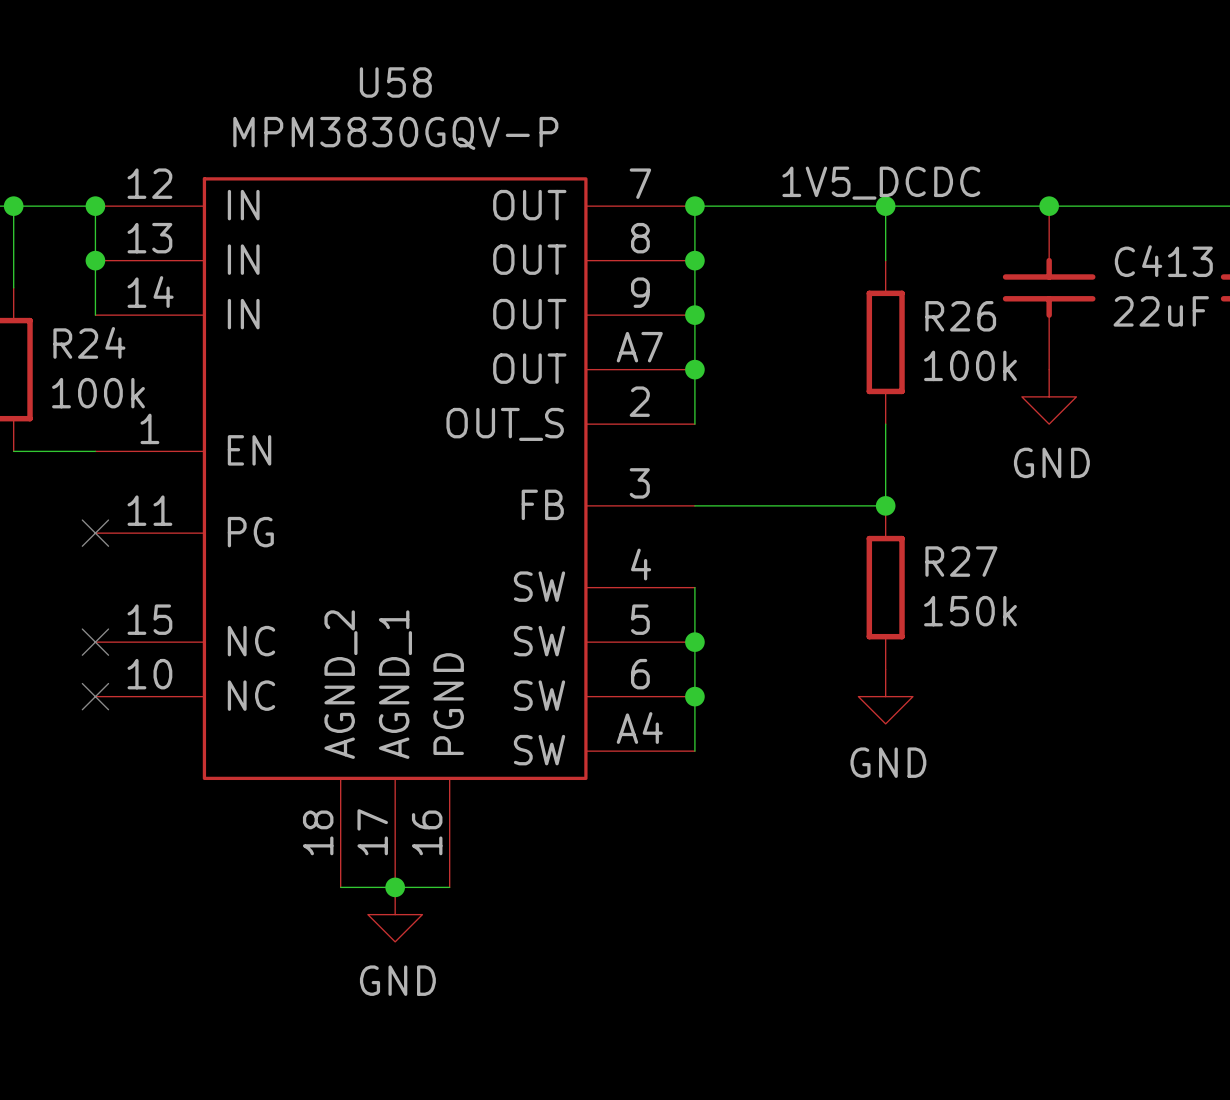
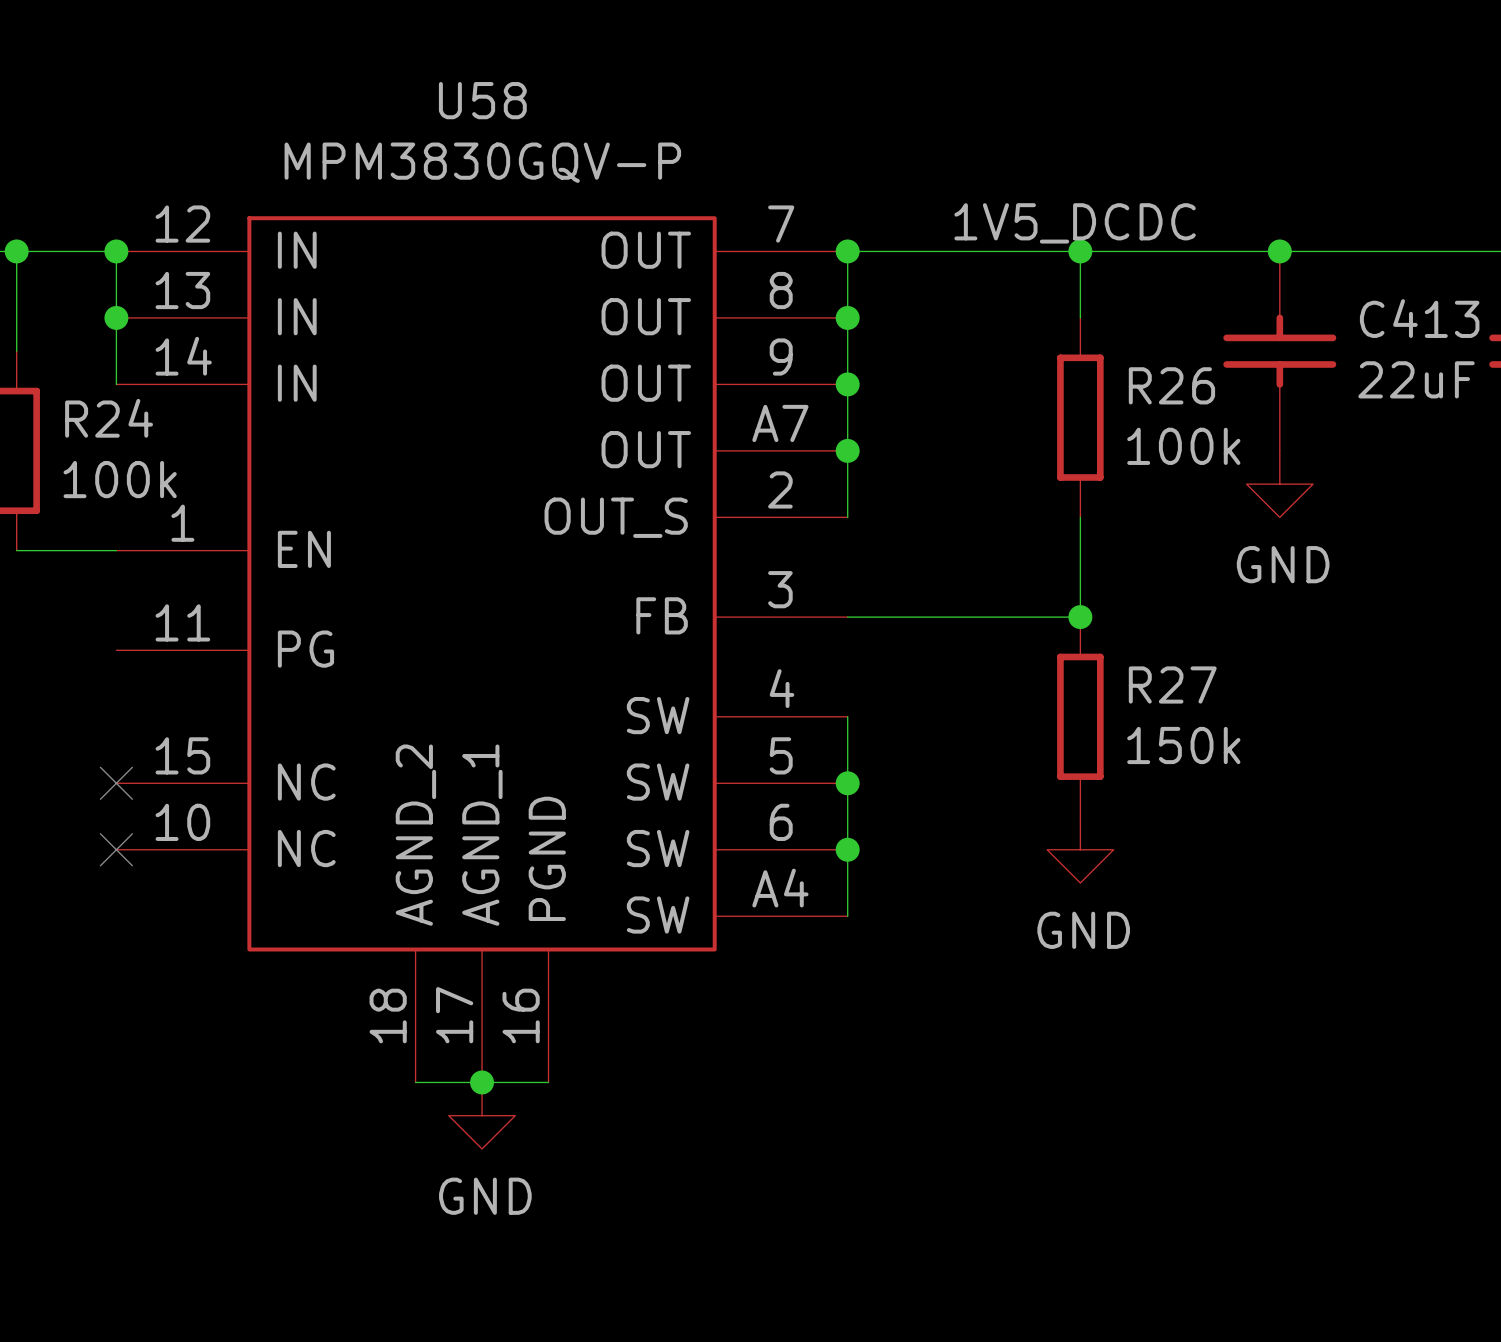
no-connect mark: (95, 533) -> none

